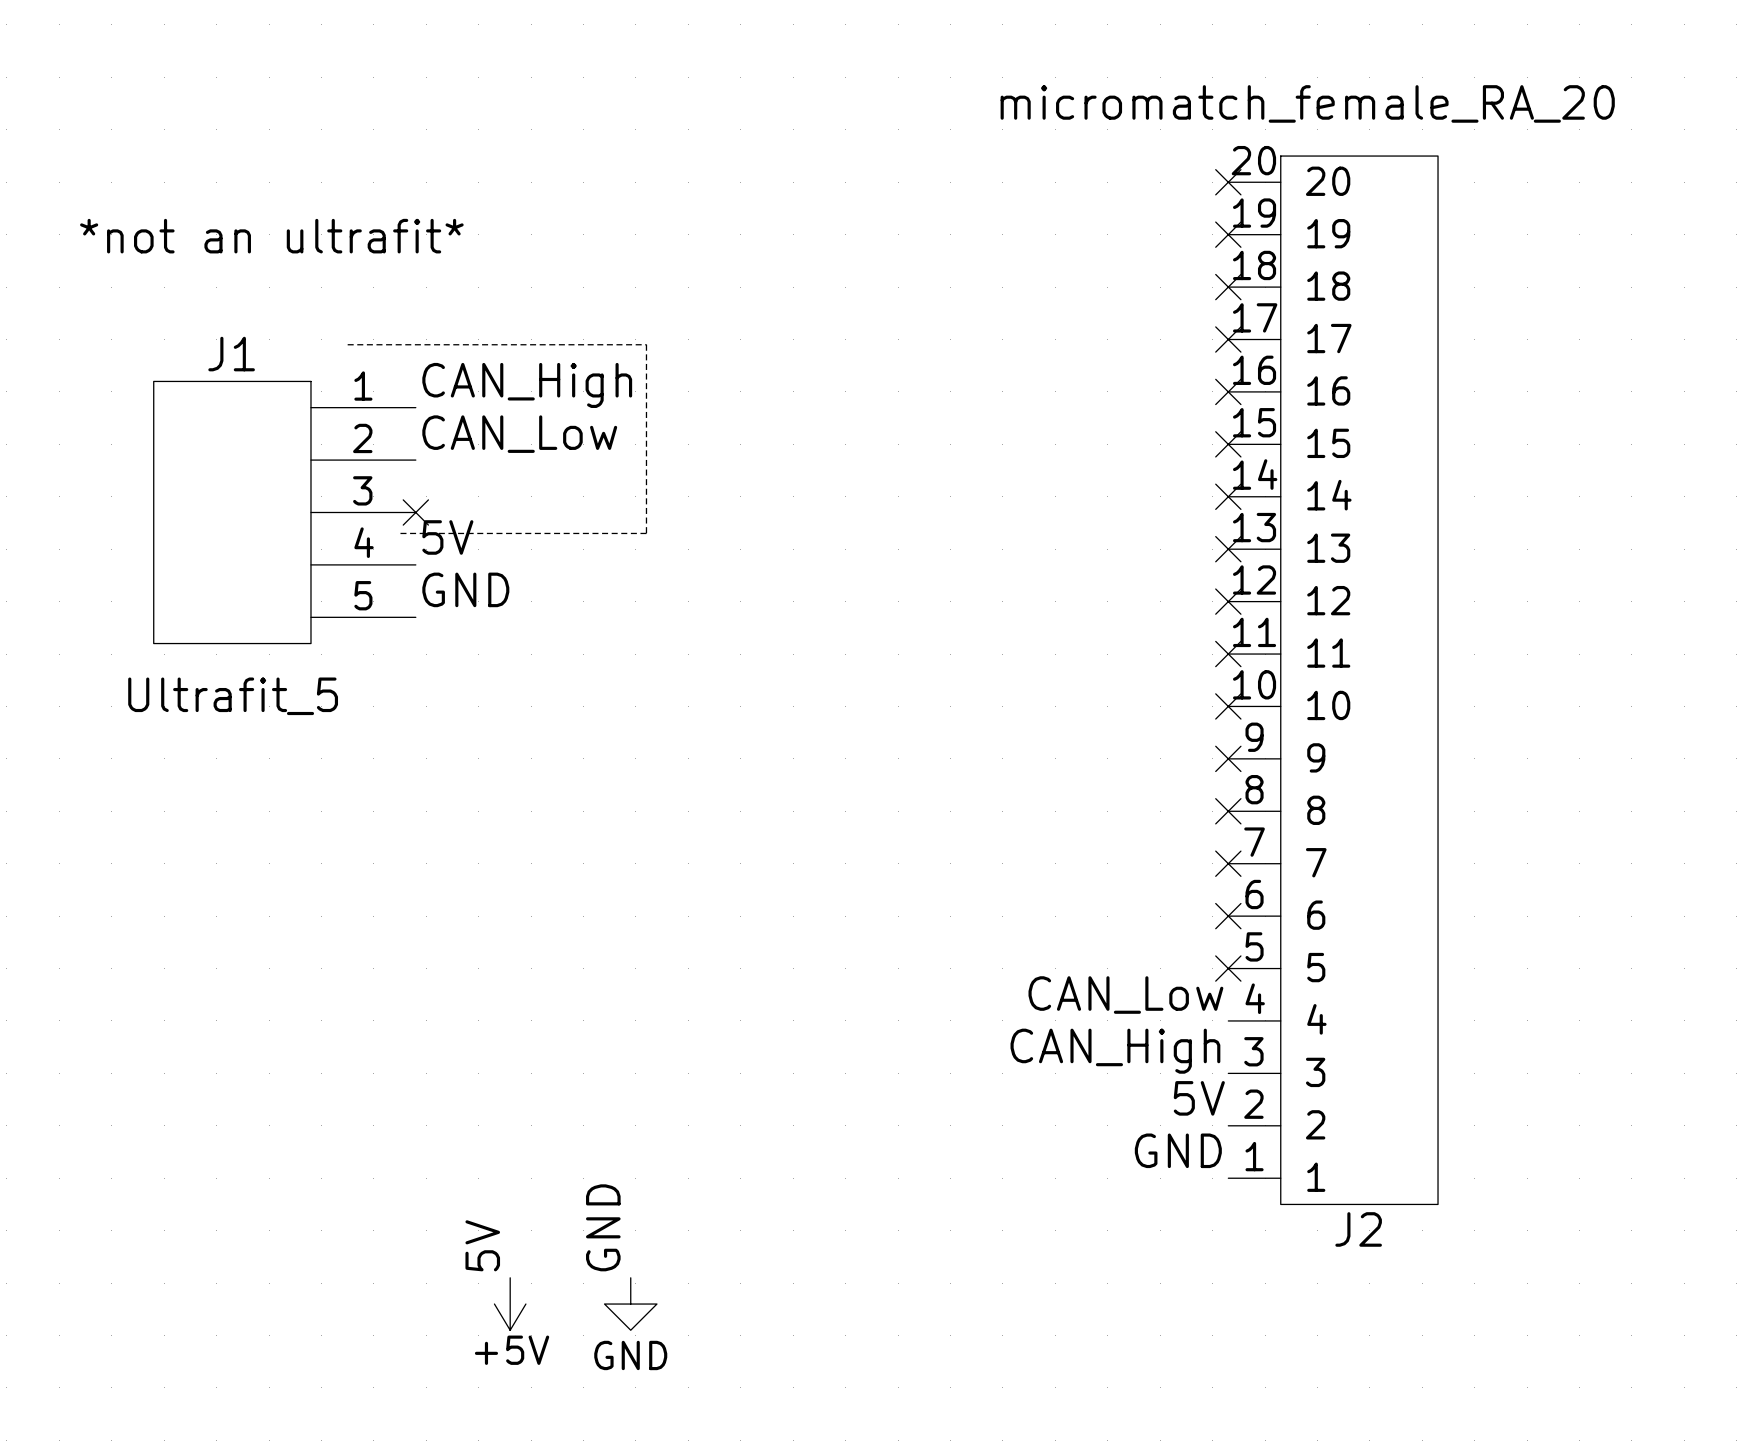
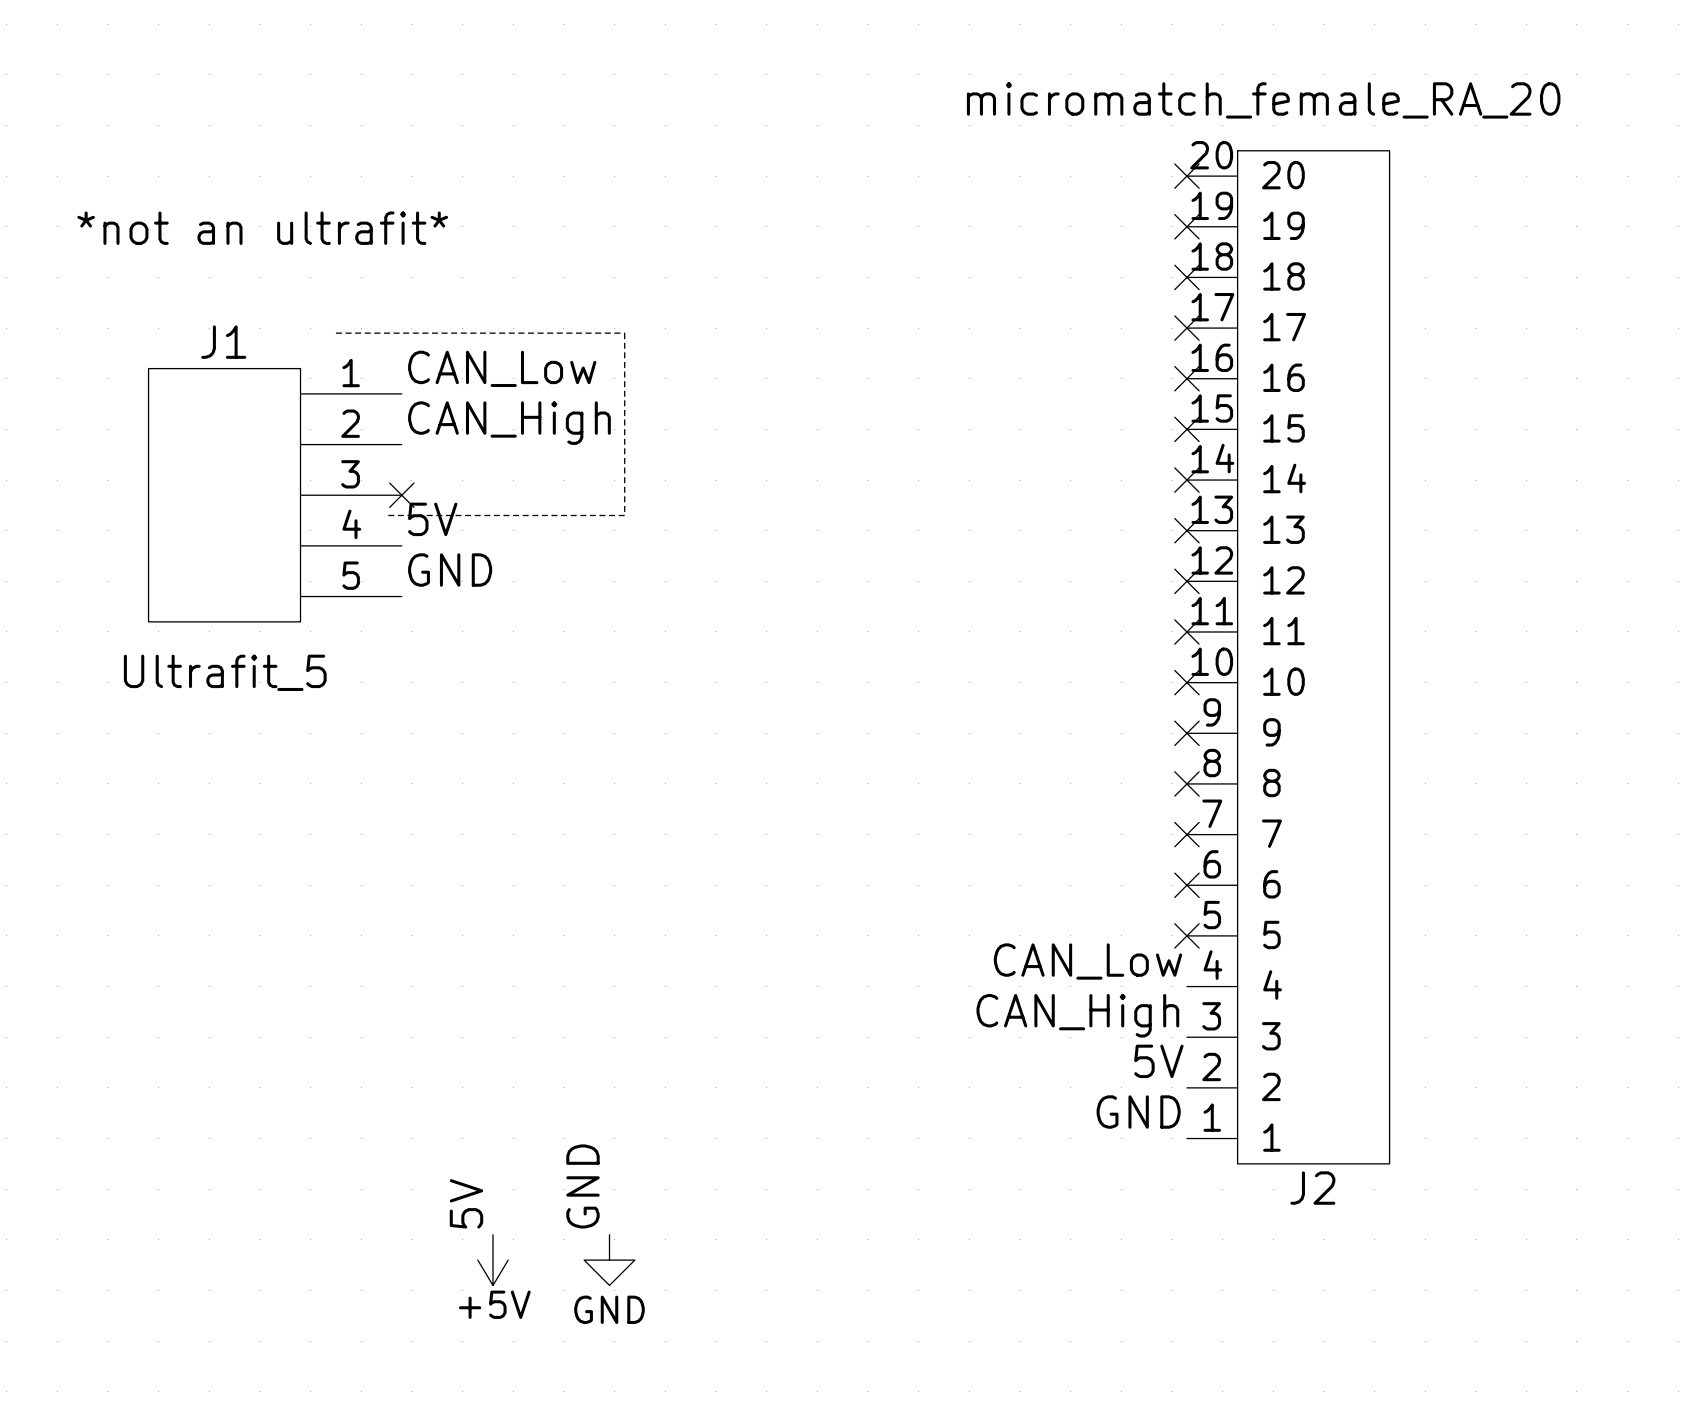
label: CAN_High (527, 385) -> CAN_Low (502, 368)
label: CAN_Low (519, 434) -> CAN_High (509, 423)

